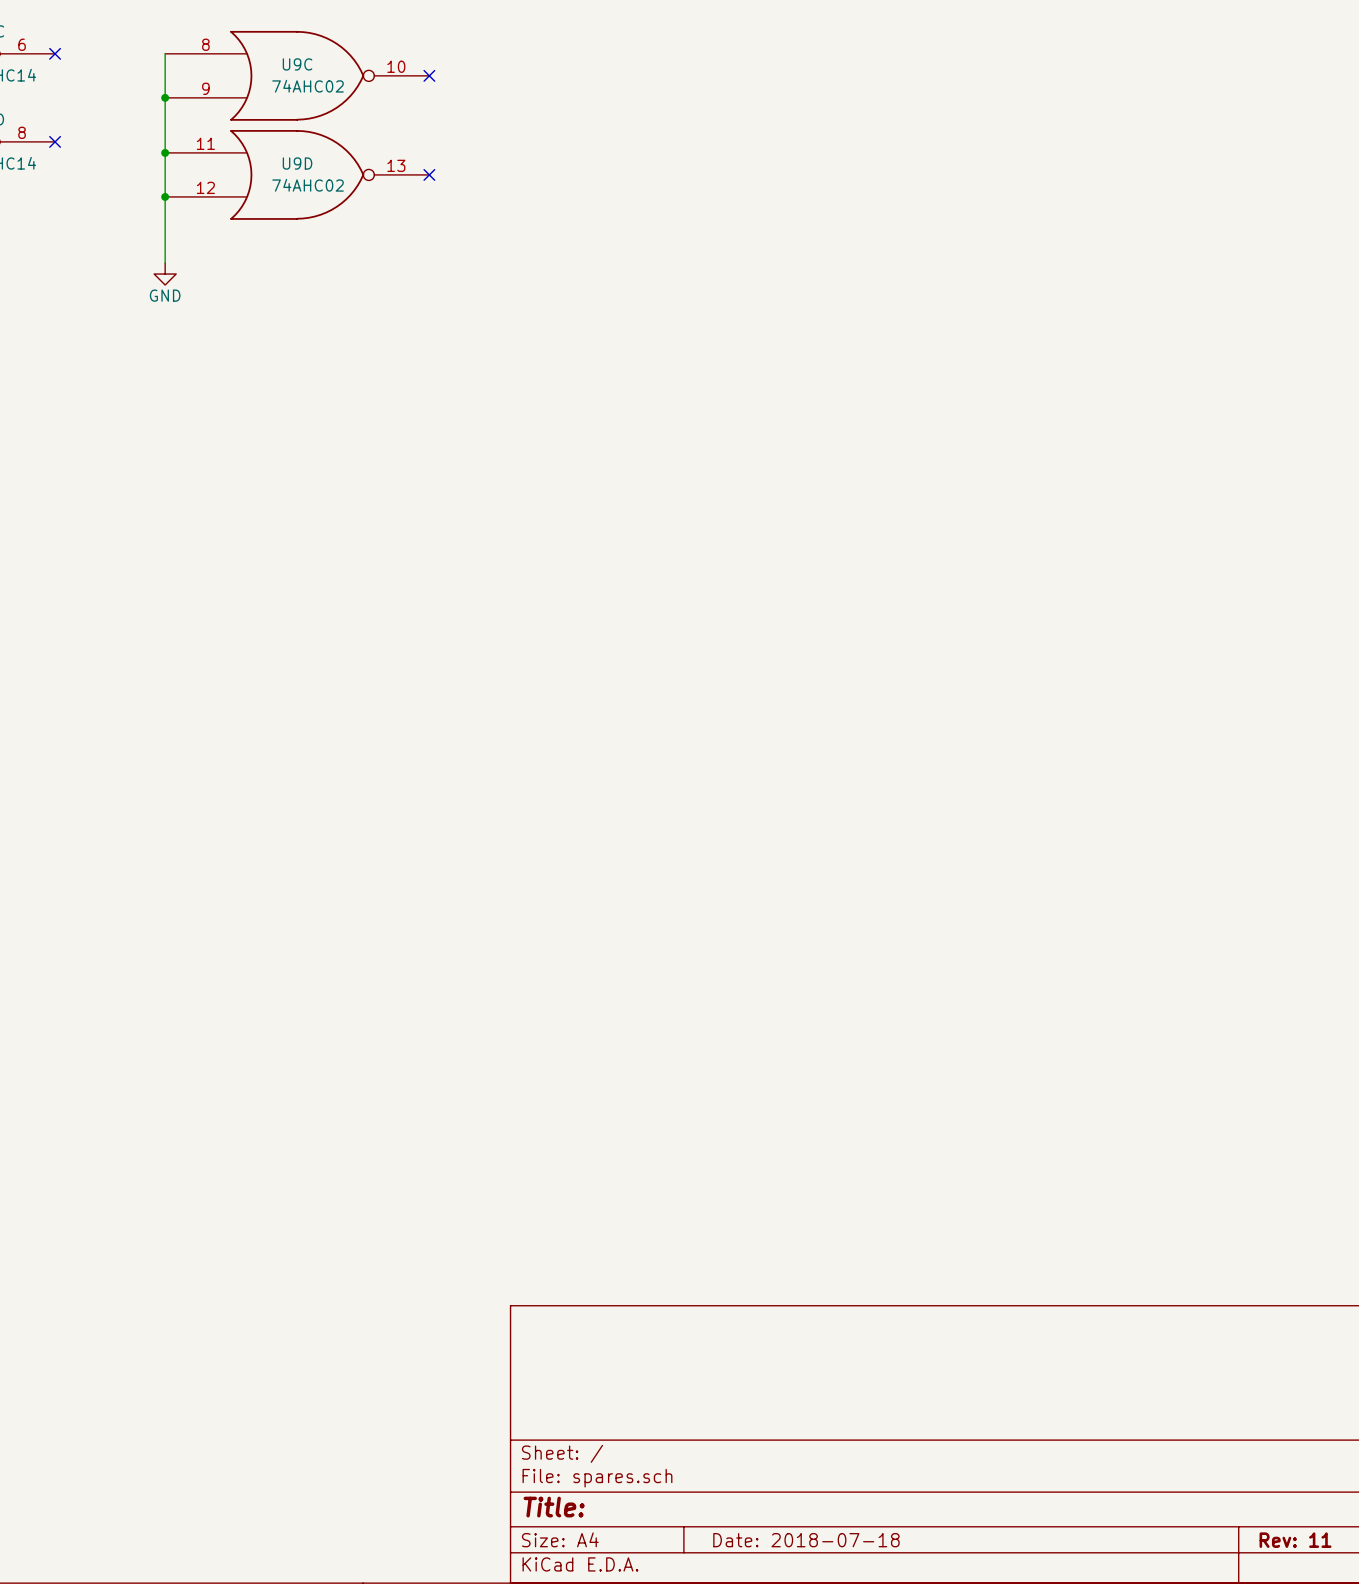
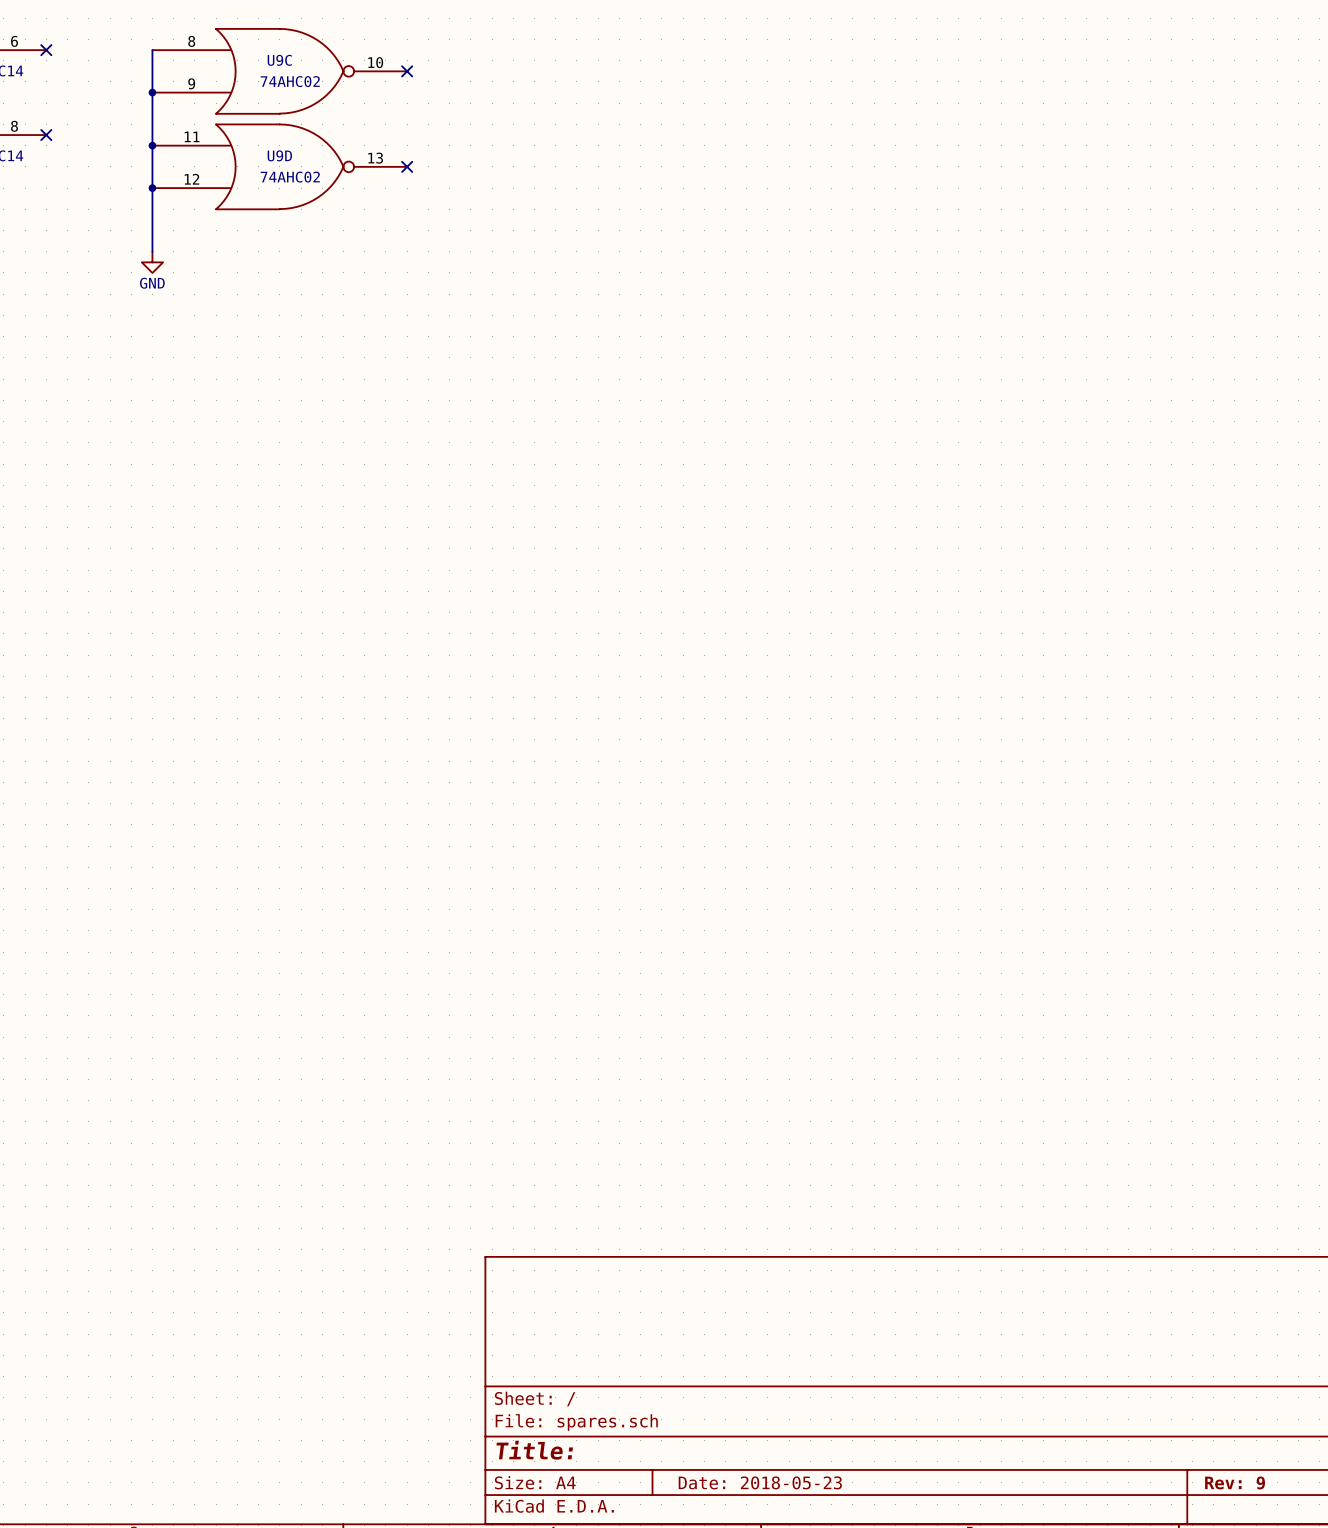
title block: Date: 2018-07-18 (806, 1540) -> Date: 2018-05-23 (760, 1482)
title block: Rev: 11 (1295, 1540) -> Rev: 9 (1235, 1482)

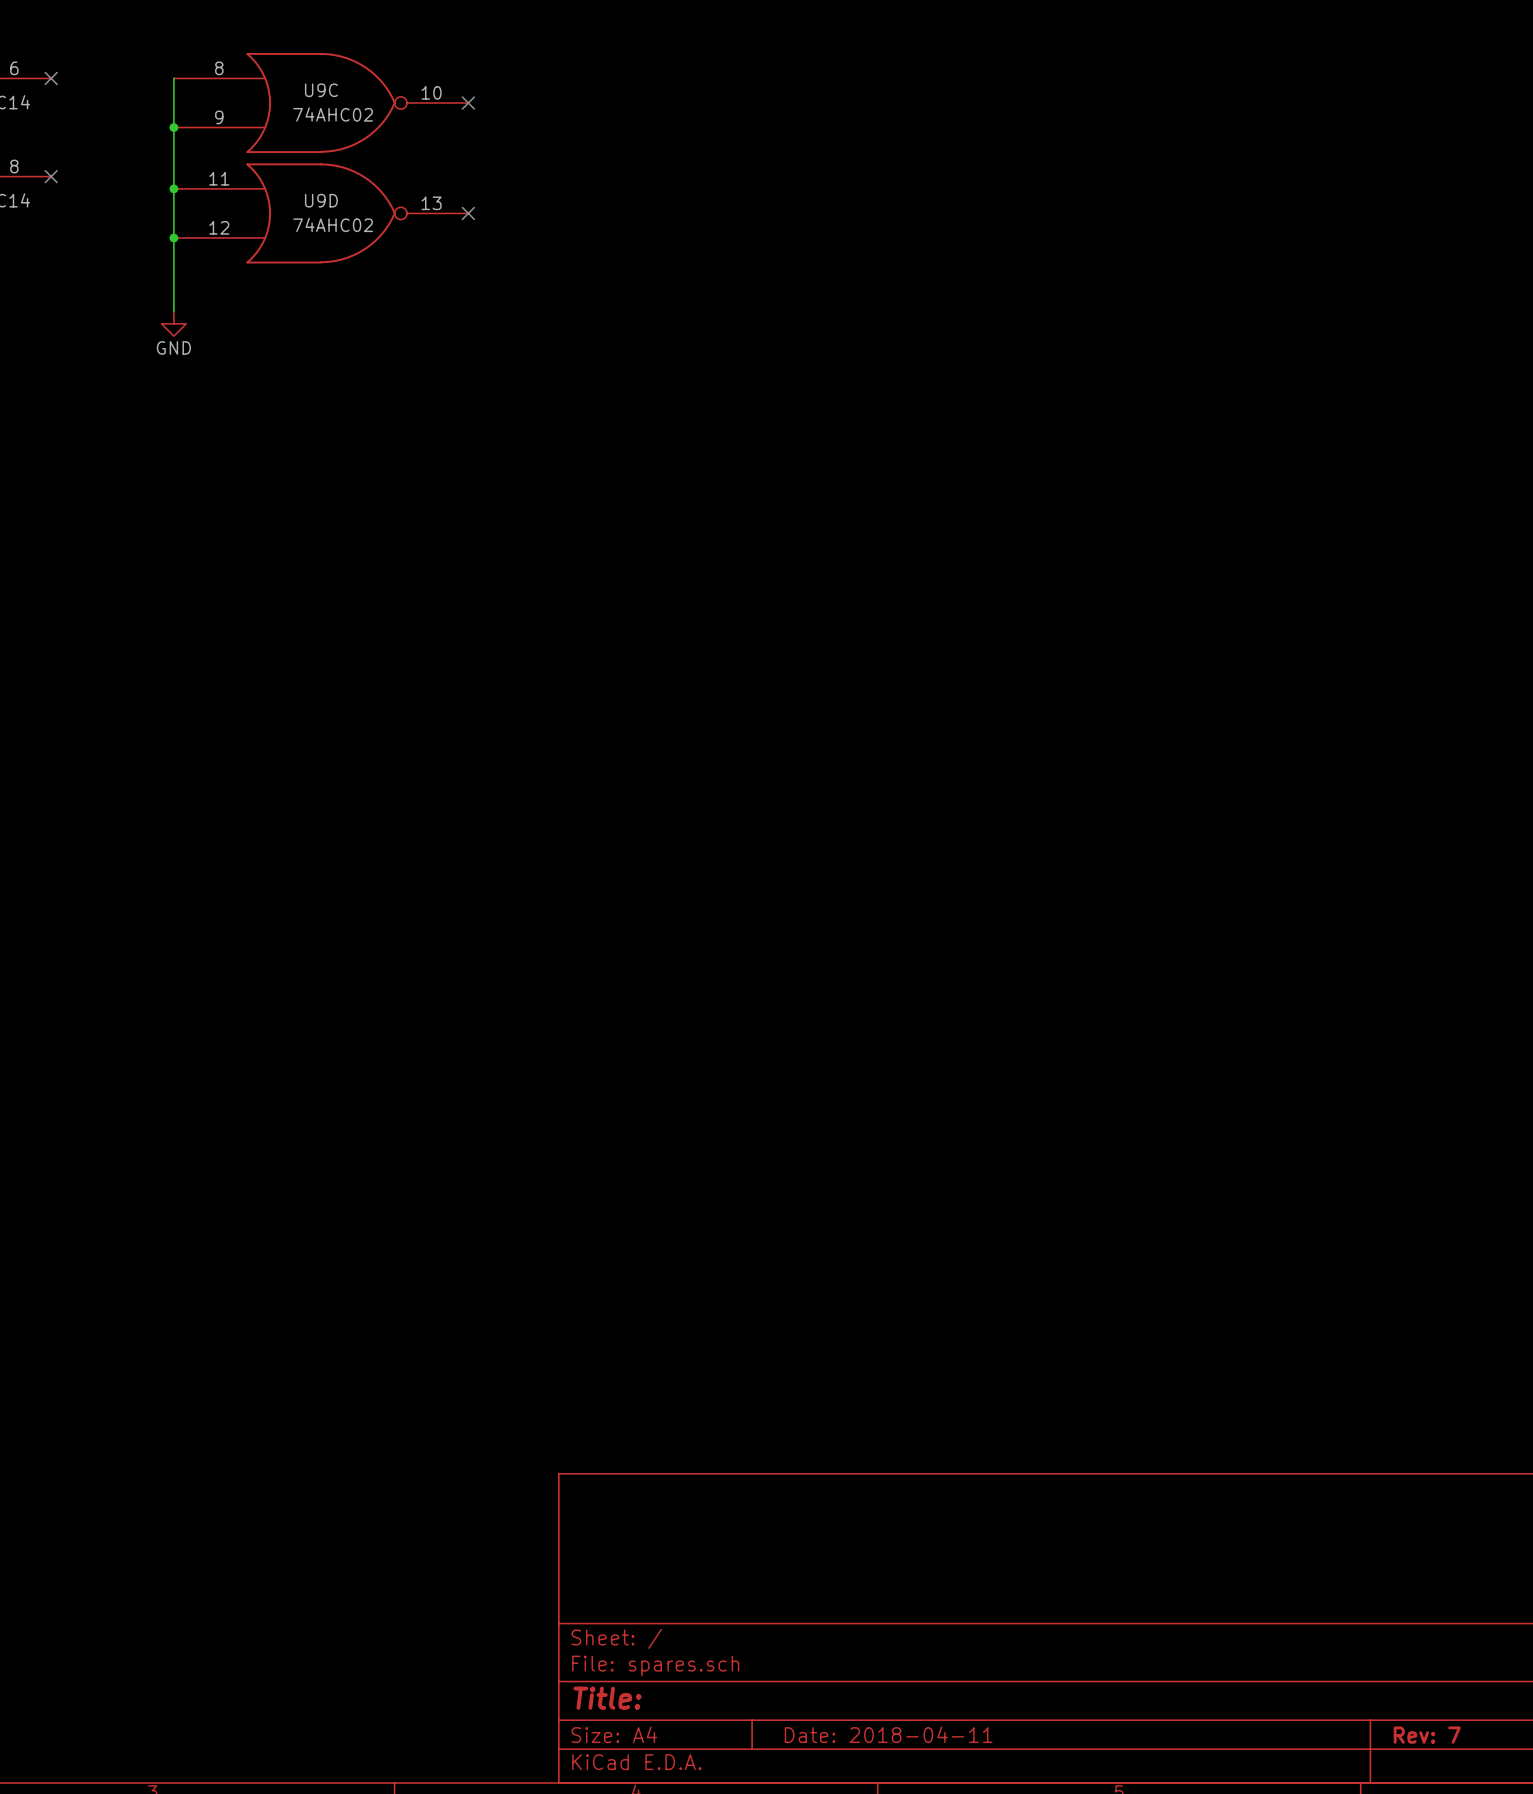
title block: Date: 2018-05-23 (760, 1482) -> Date: 2018-04-11 (888, 1734)
title block: Rev: 9 (1235, 1482) -> Rev: 7 (1427, 1735)

